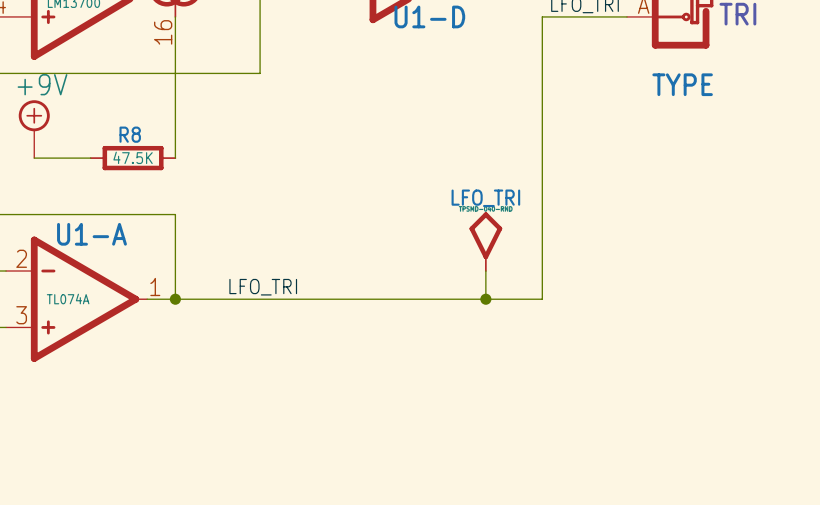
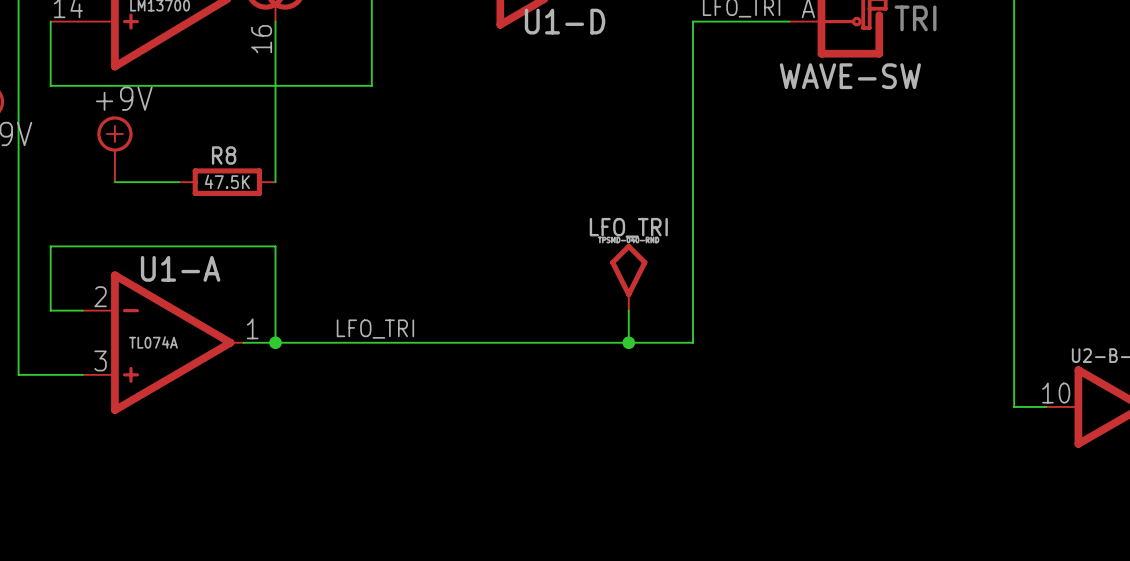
TYPE name: TYPE (682, 84) -> WAVE-SW (850, 76)

